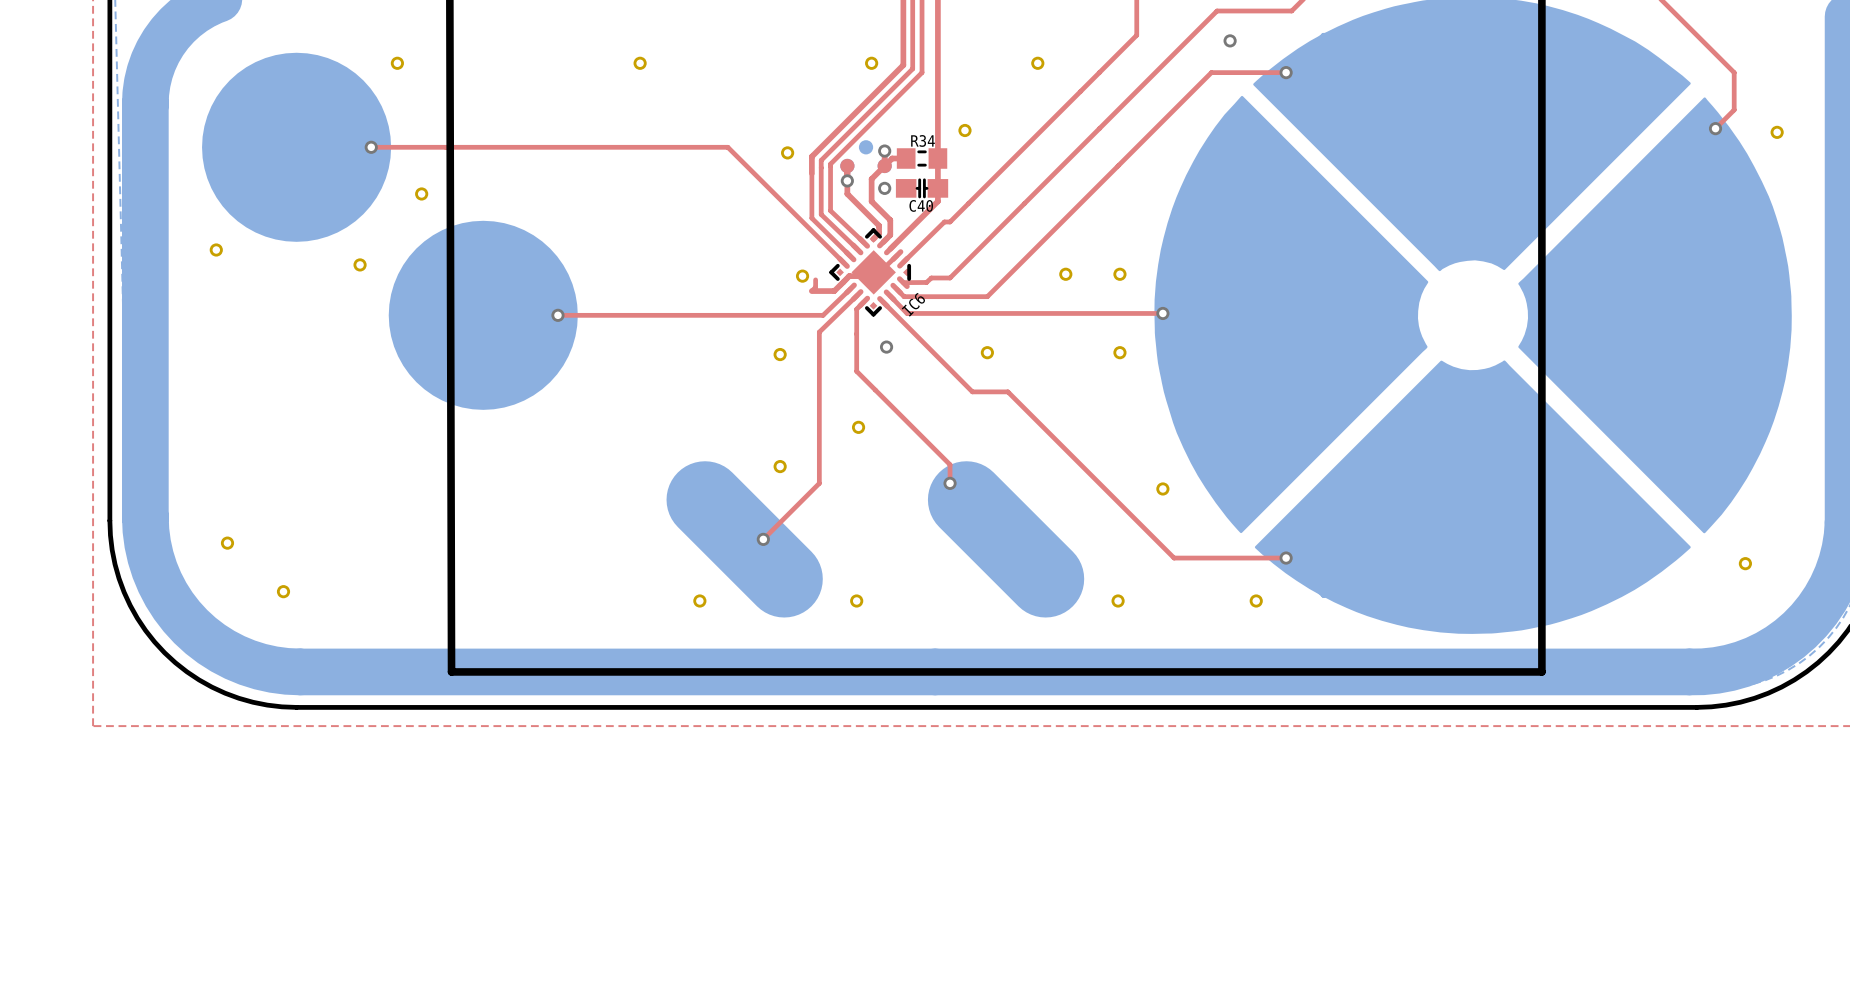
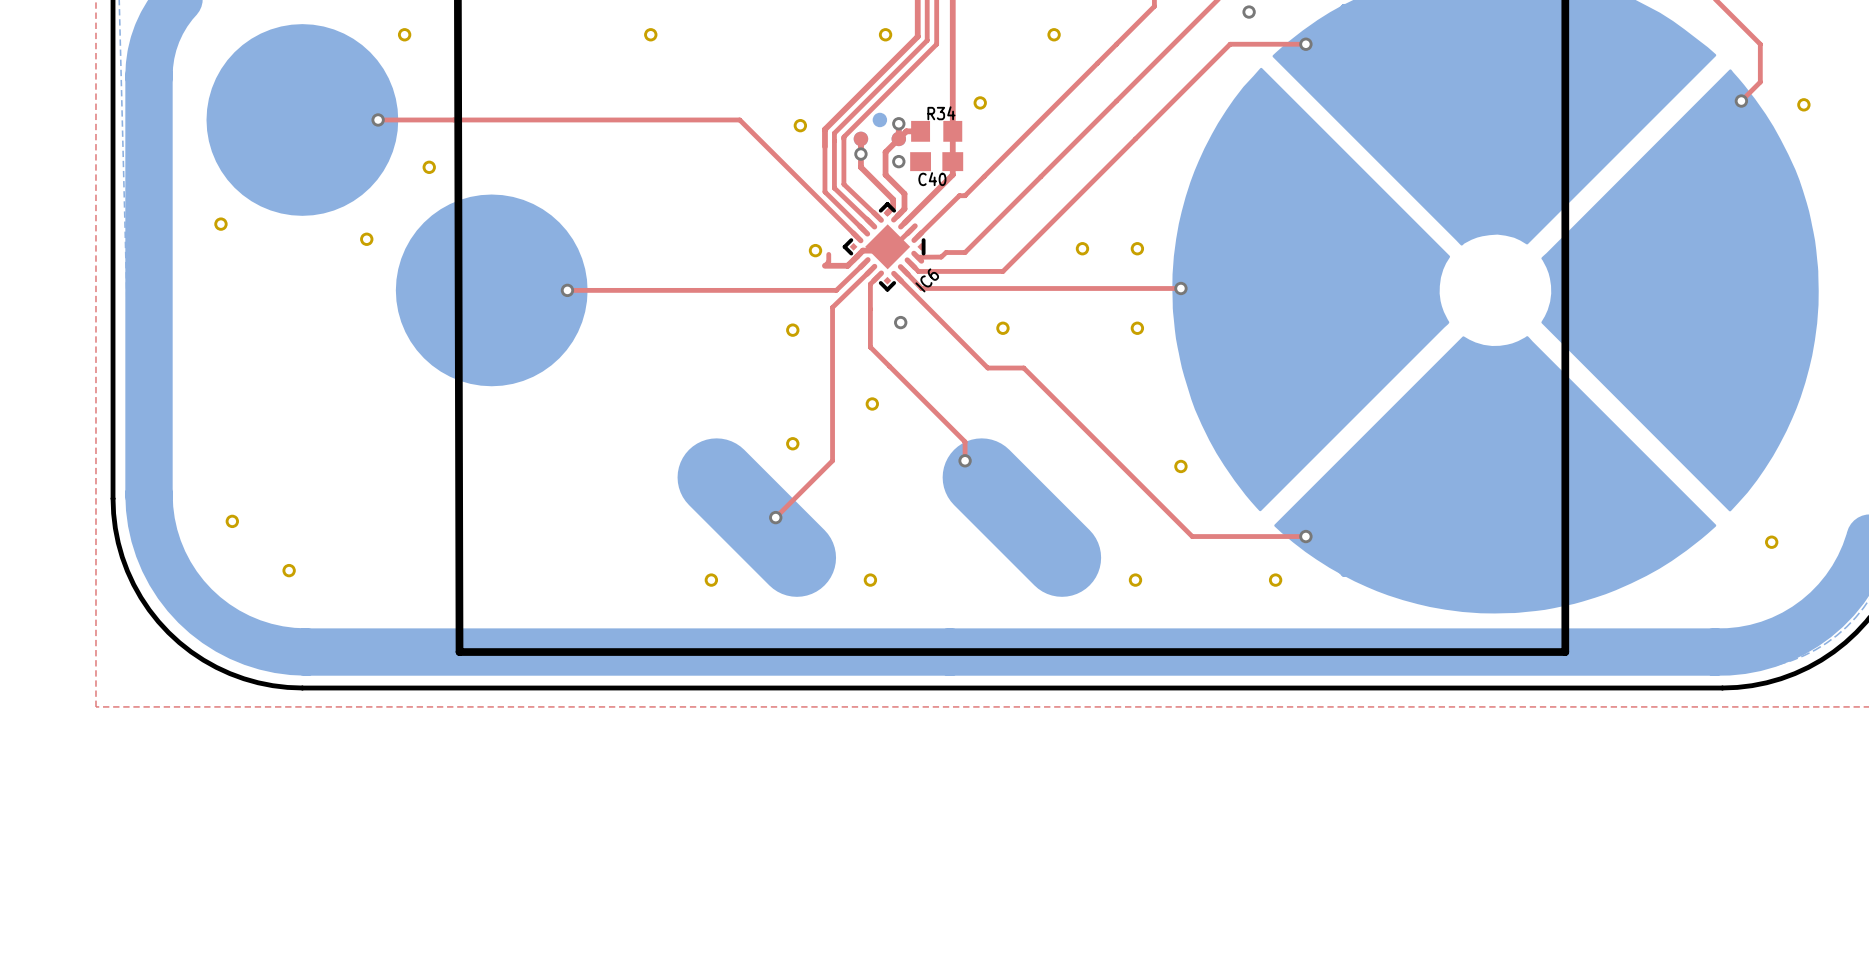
R34 footprint: [896, 148, 948, 169] -> [911, 120, 963, 142]
C40 footprint: [895, 178, 949, 199] -> [910, 152, 964, 172]

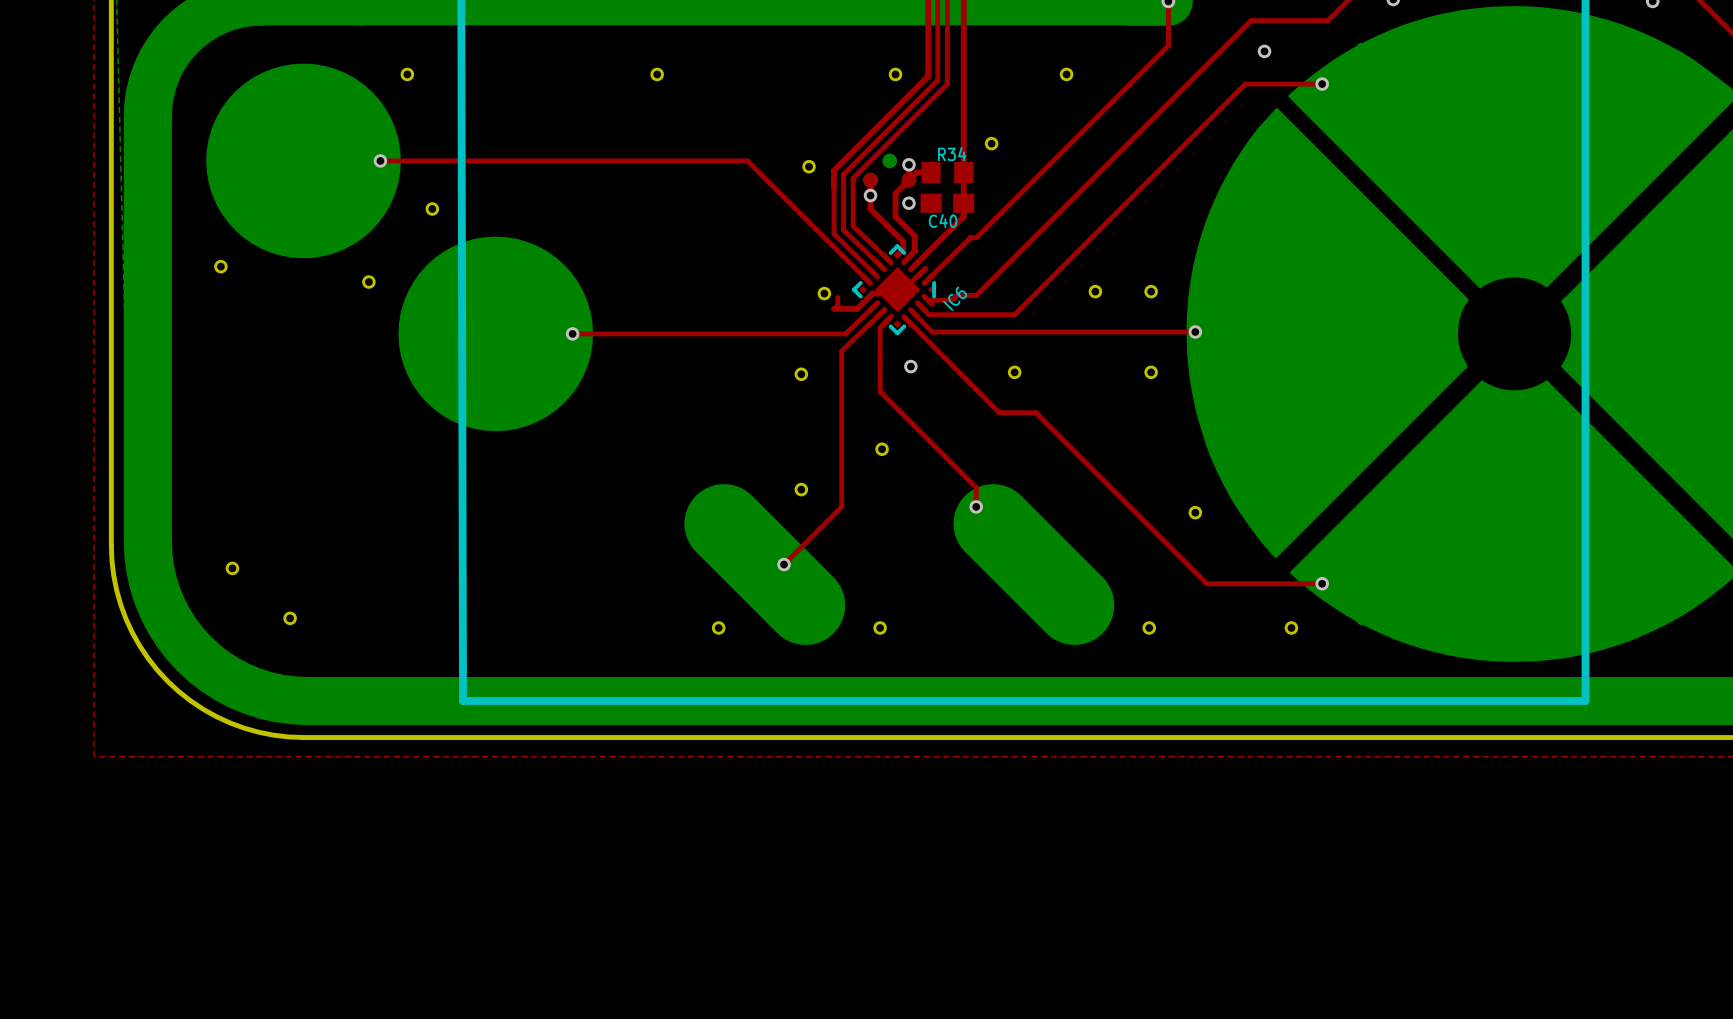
IC6 name position: IC6 (927, 280) -> IC6 (955, 298)

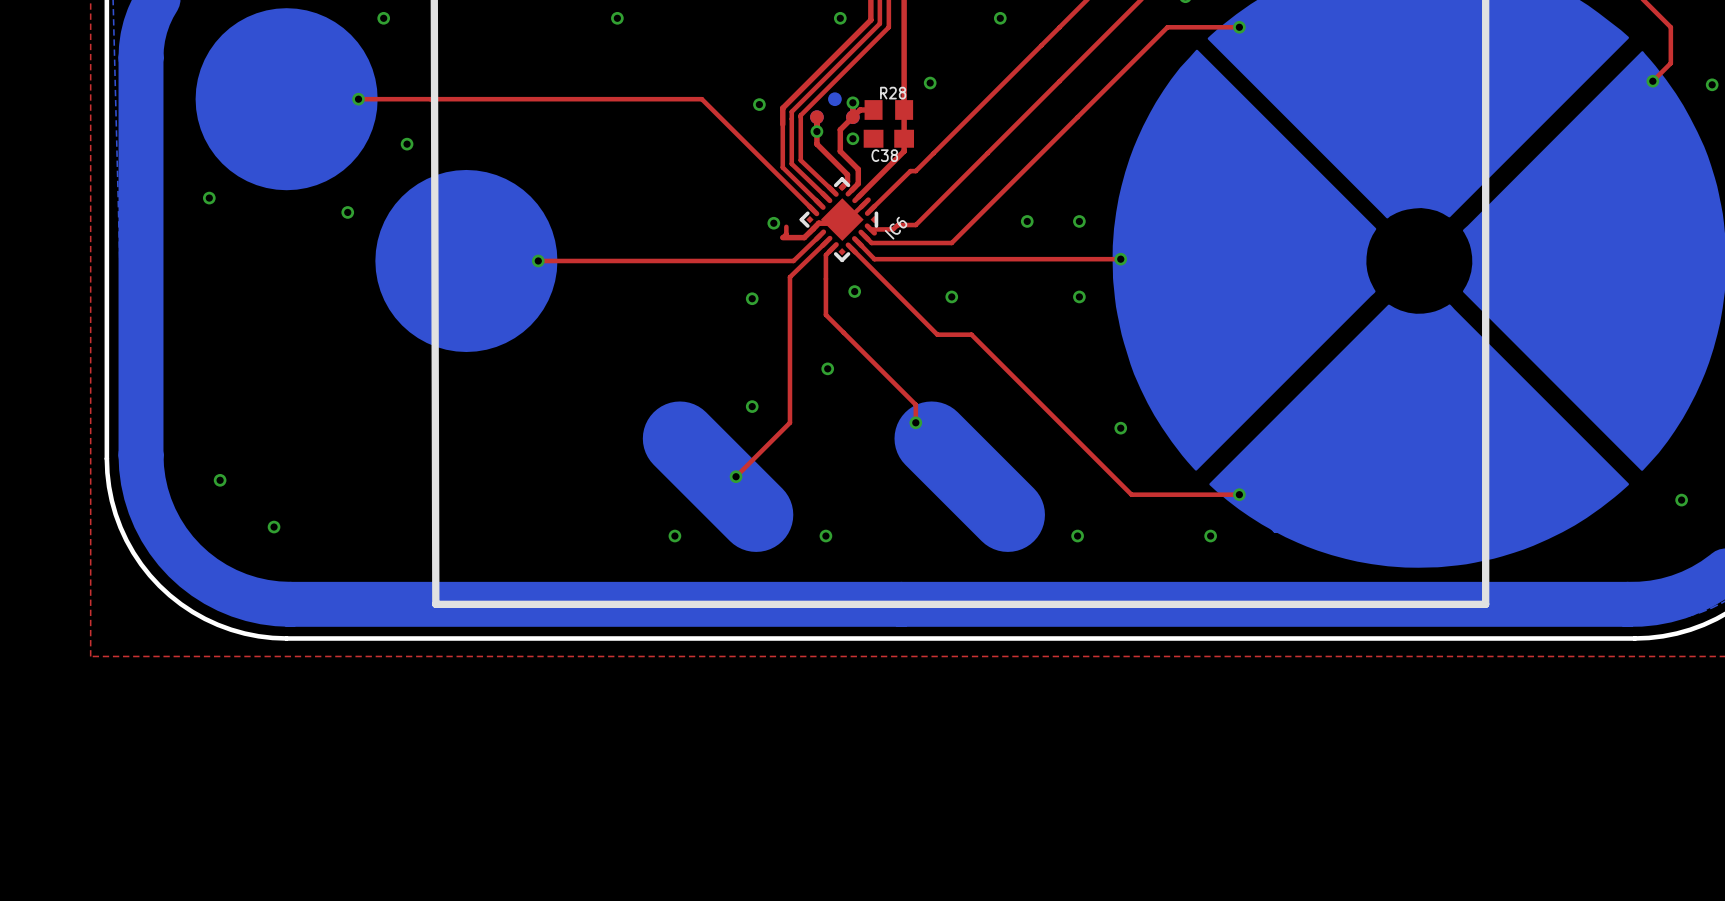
R34 name: R34 (952, 154) -> R28 (893, 93)
C40 name: C40 (943, 221) -> C38 (884, 155)

